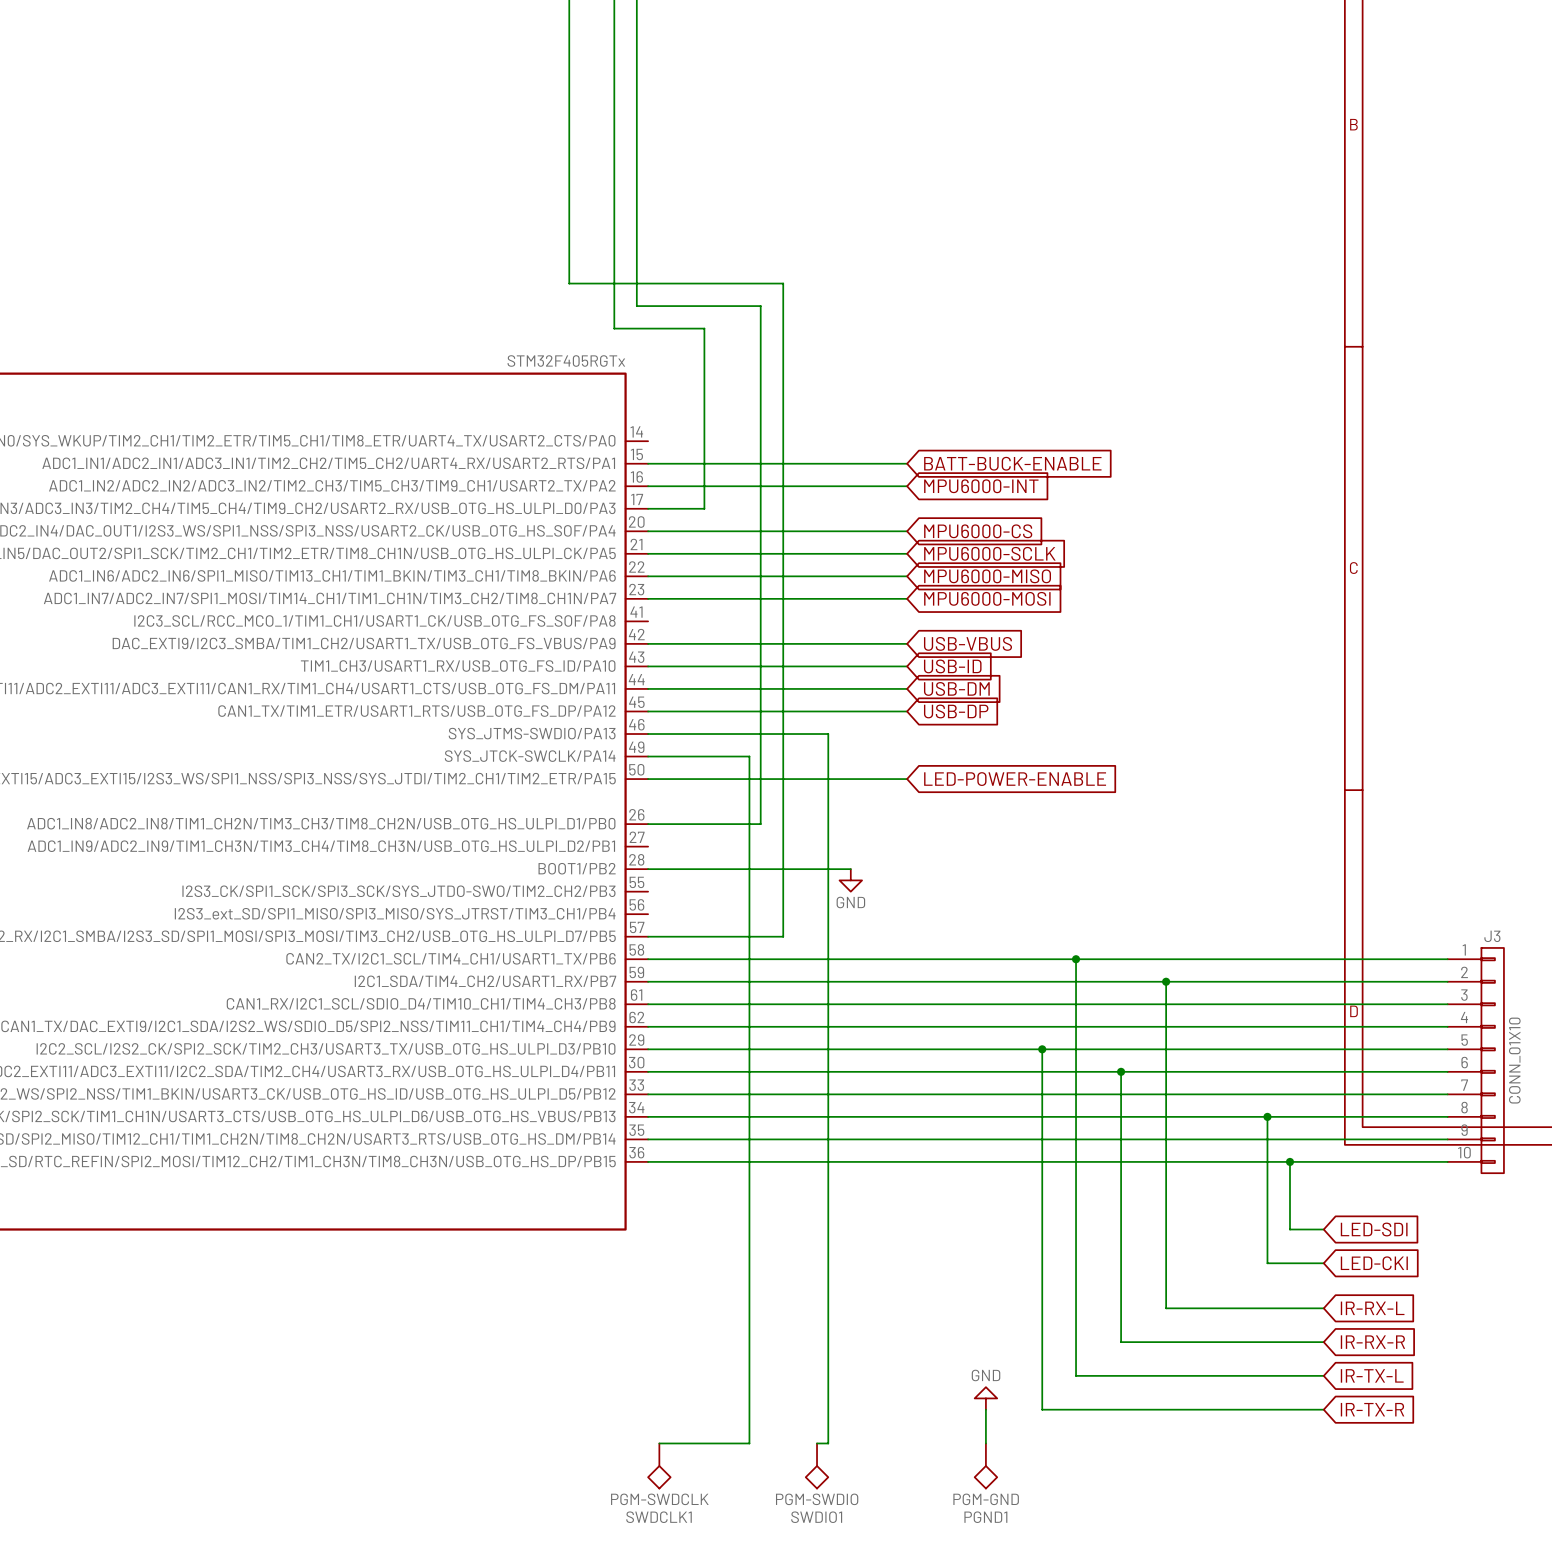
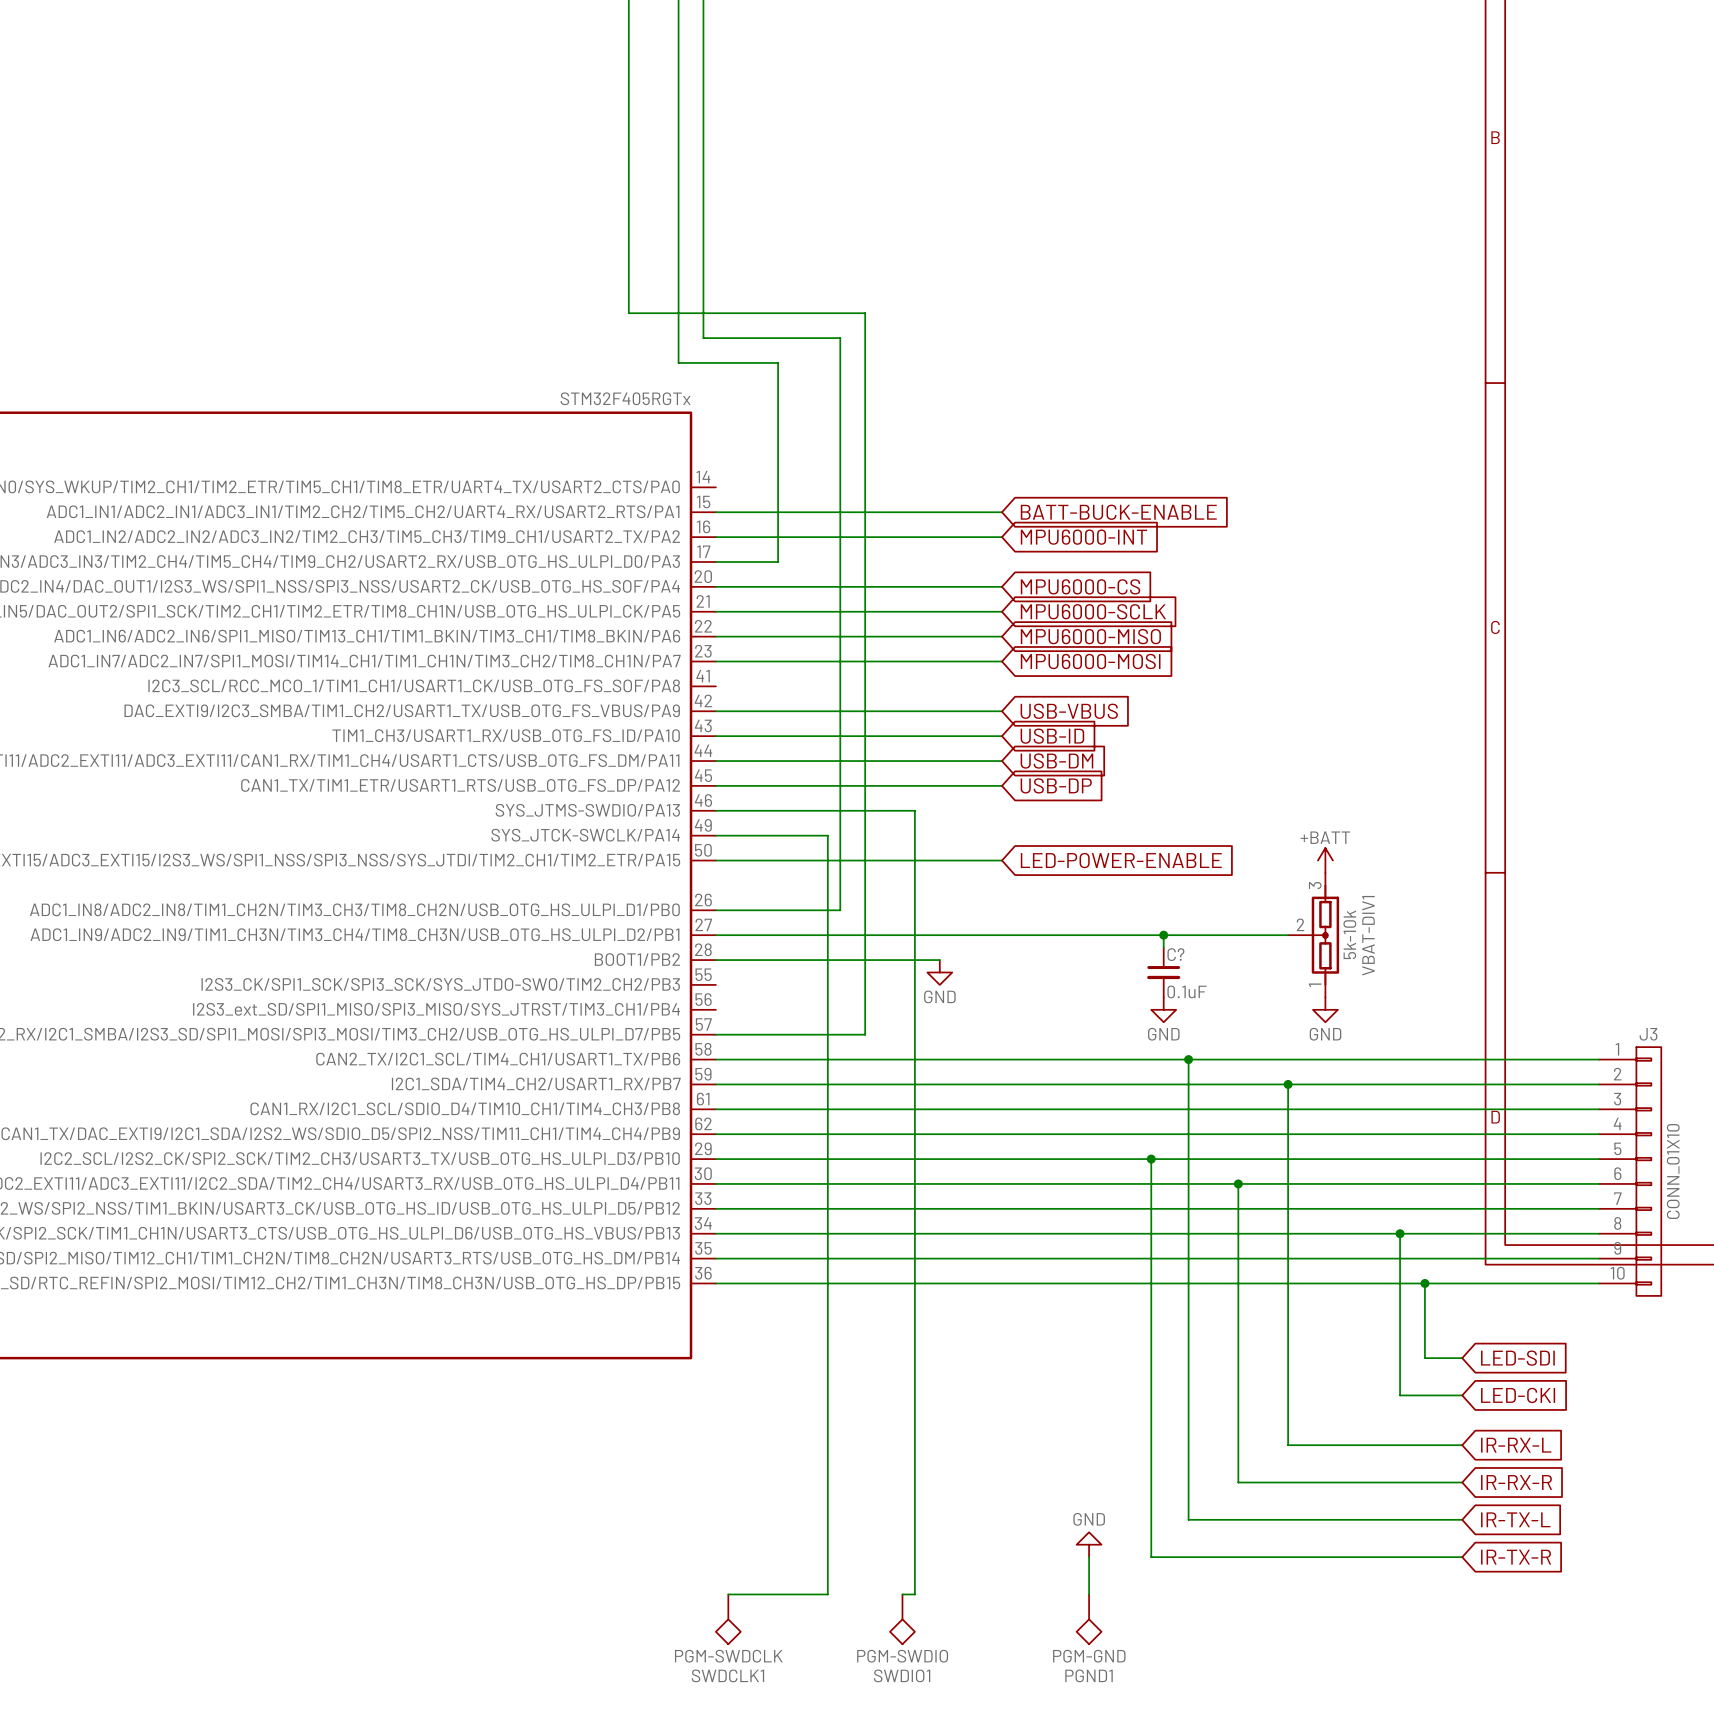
power symbol: none -> +BATT (1325, 860)
wire: none -> (715, 935) (1288, 935)
wire: none -> (1163, 935) (1163, 947)
junction: none -> (1163, 935)
VBAT-DIV1: none -> 5k-10k (1313, 935)
C?: none -> 0.1uF (1163, 972)
power symbol: none -> GND (1163, 1009)
power symbol: none -> GND (1325, 1009)

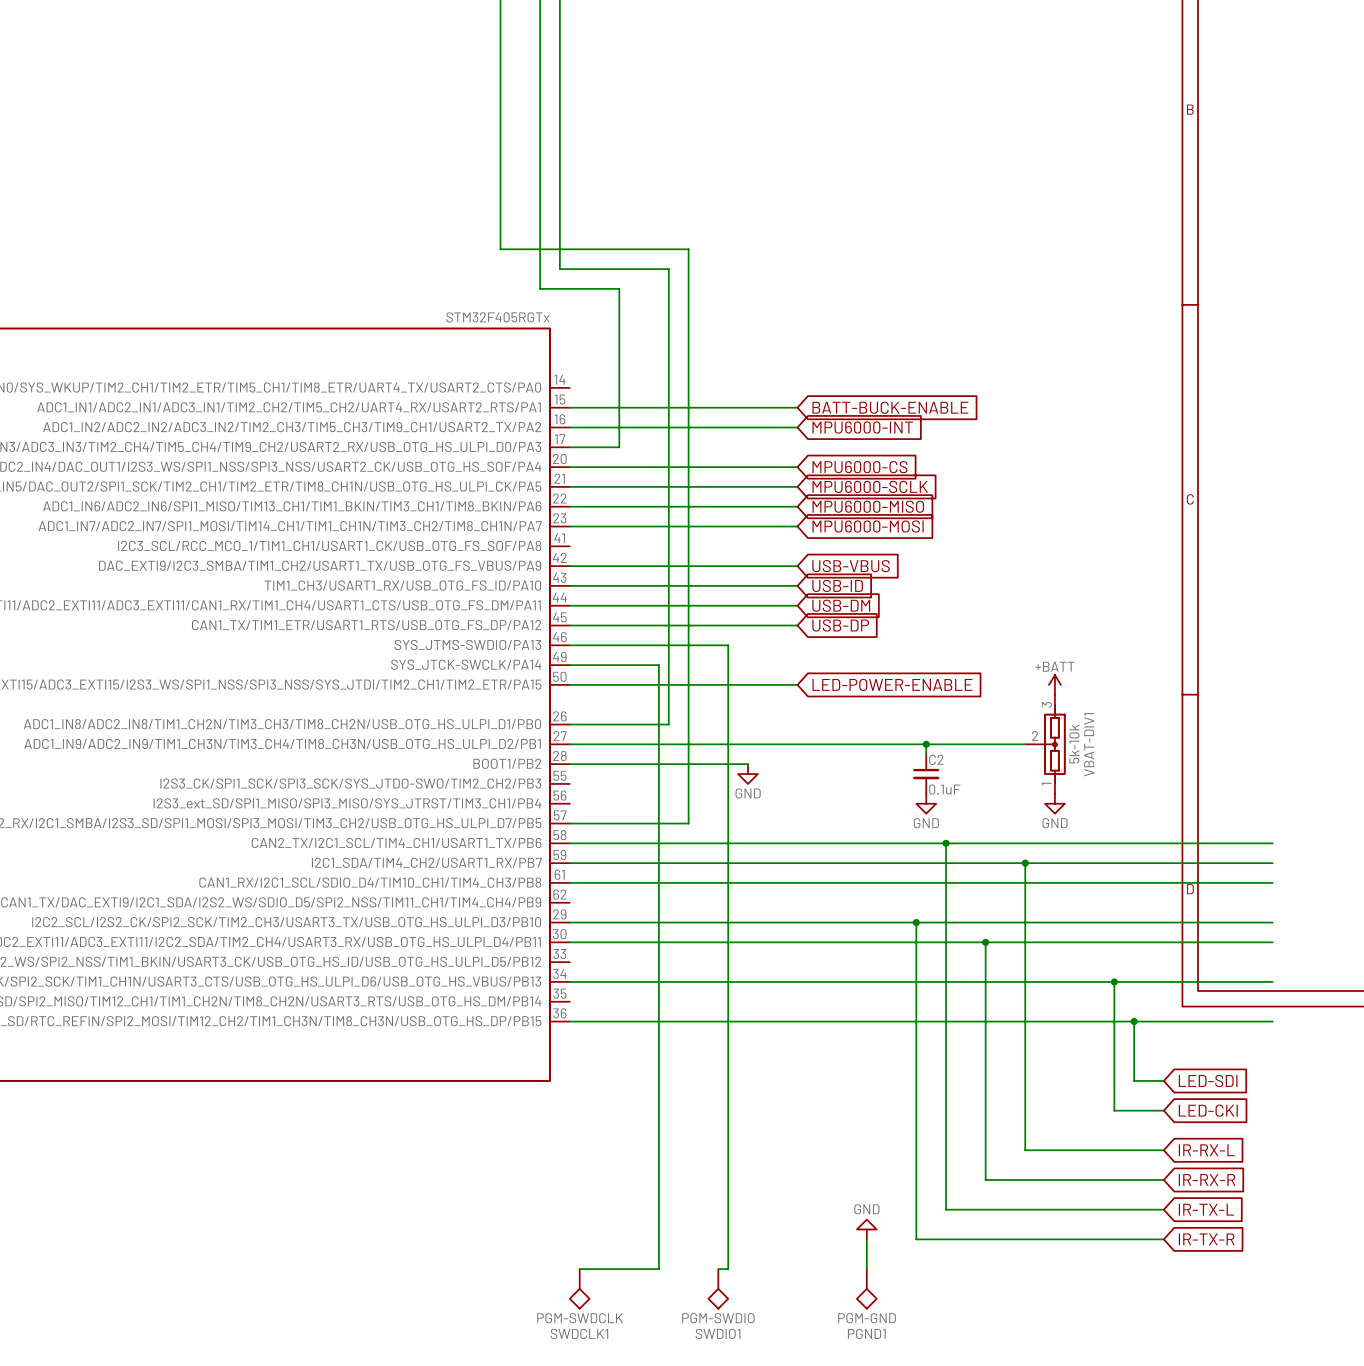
C? name: C? (1175, 954) -> C2 (936, 759)
wire: (715, 1134) (1599, 1134) -> none
J3: CONN_01X10 (1630, 1171) -> none
wire: (715, 1208) (1599, 1208) -> none
wire: (715, 1258) (1599, 1258) -> none

